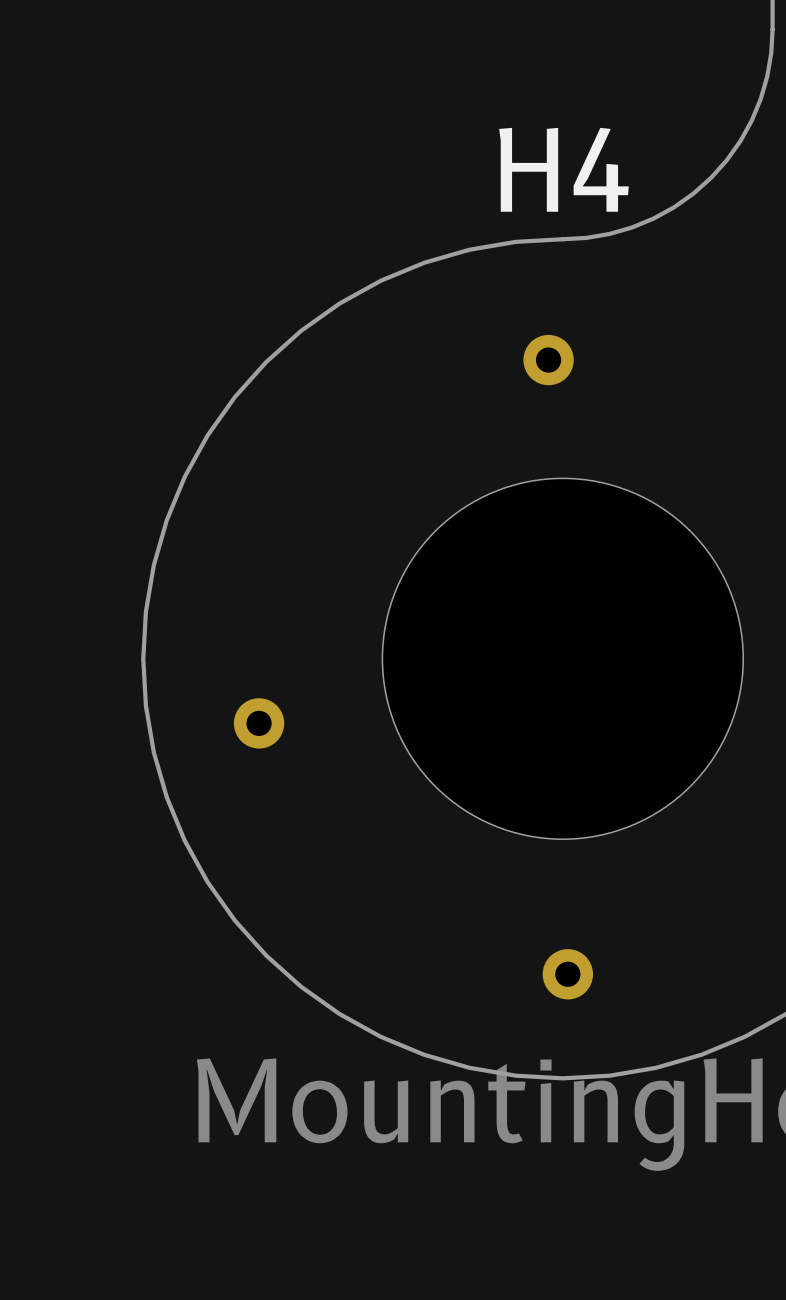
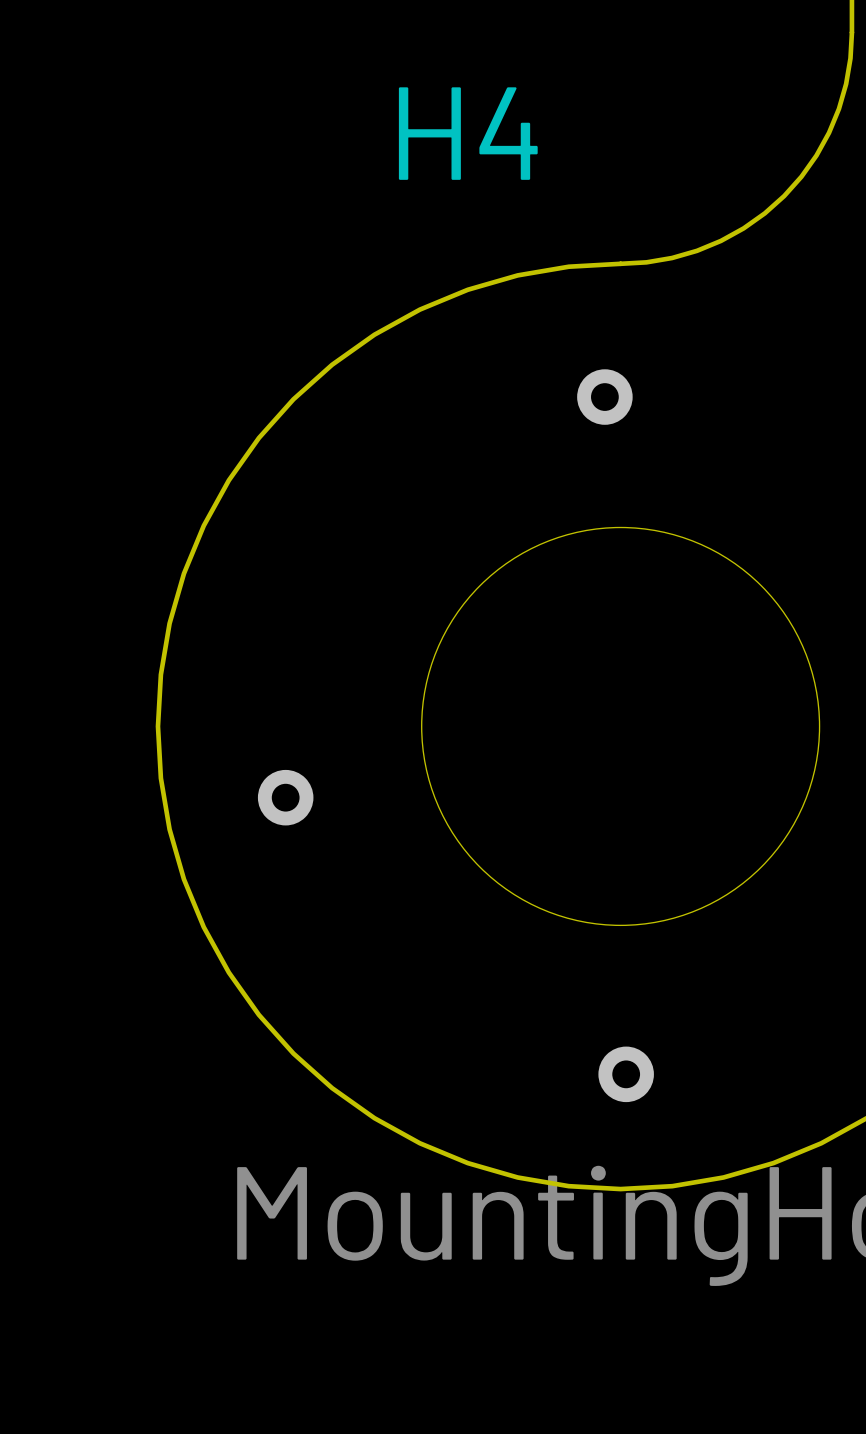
H4 name position: H4 (563, 169) -> H4 (468, 133)

